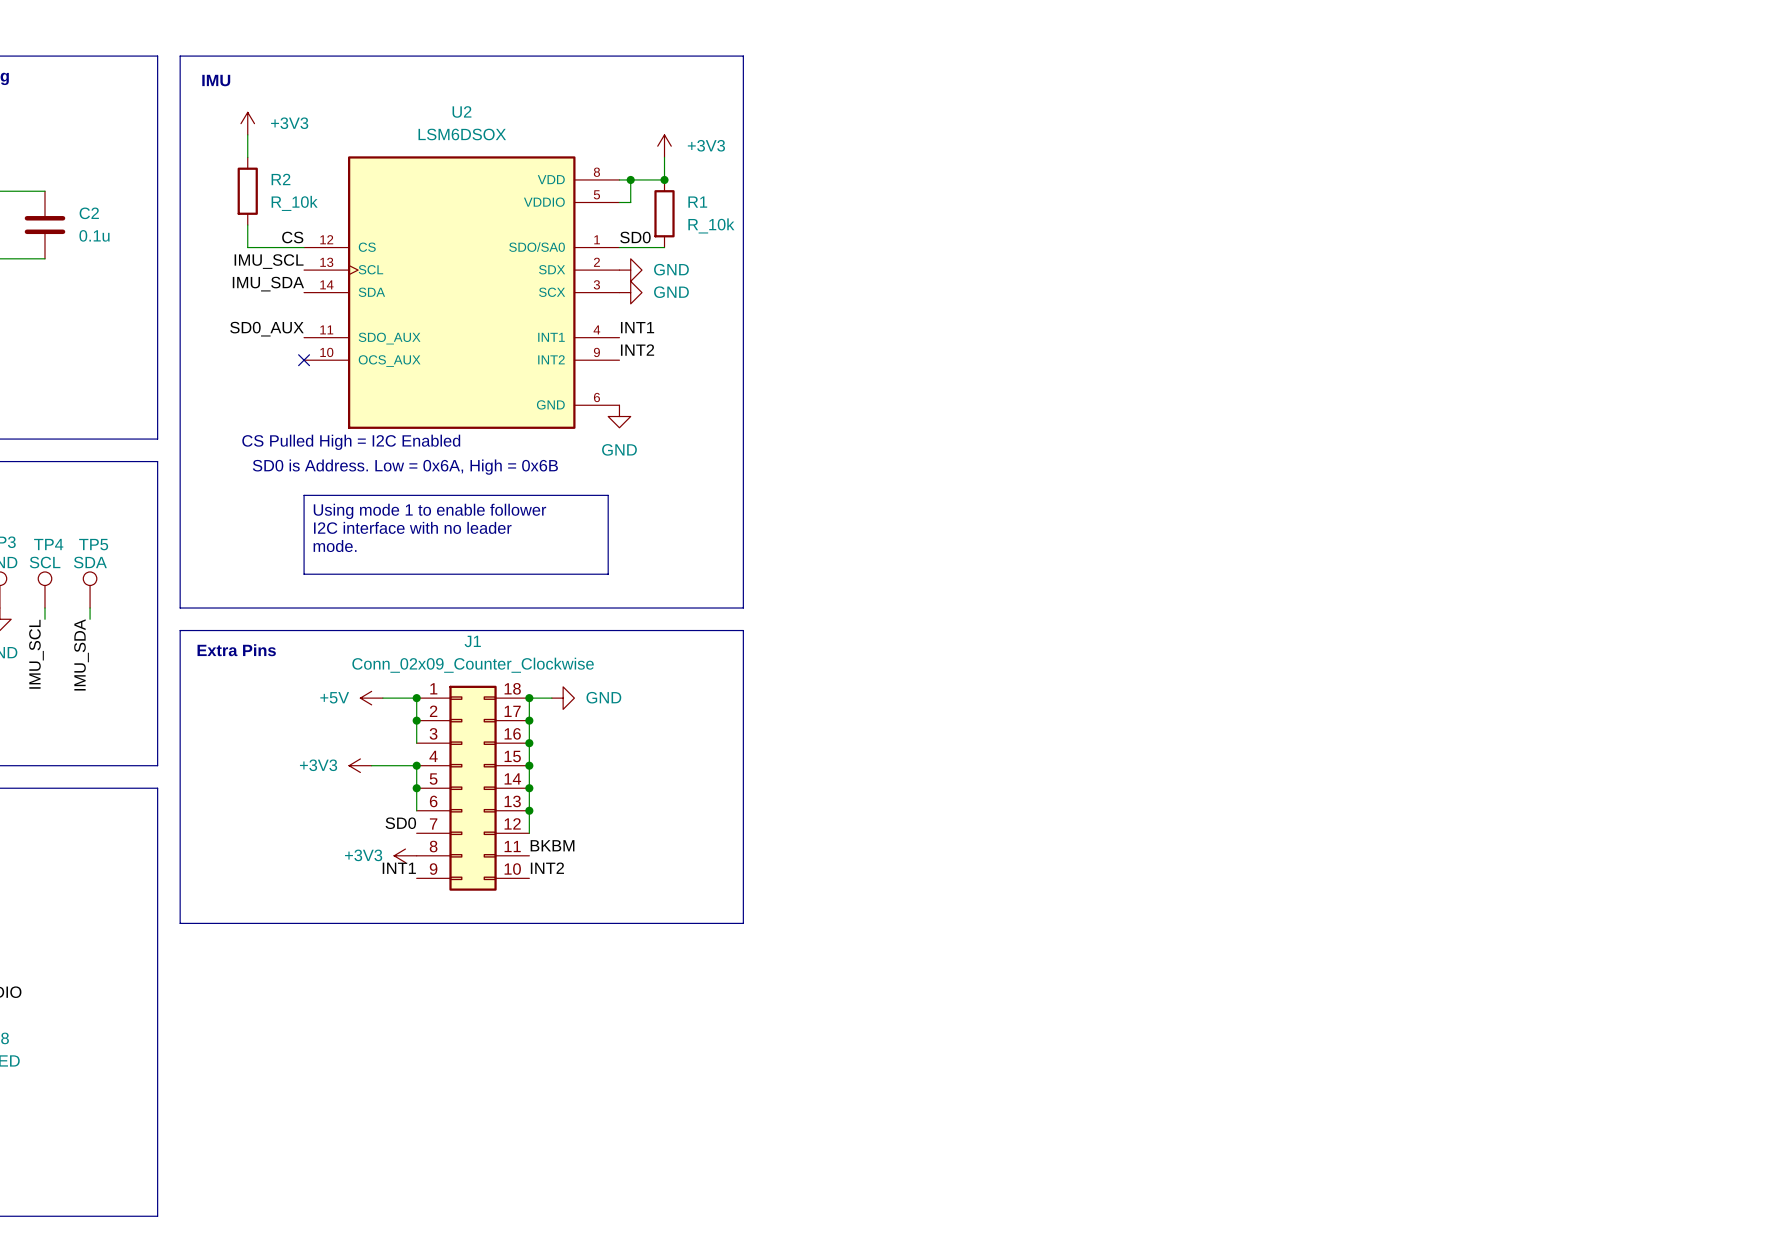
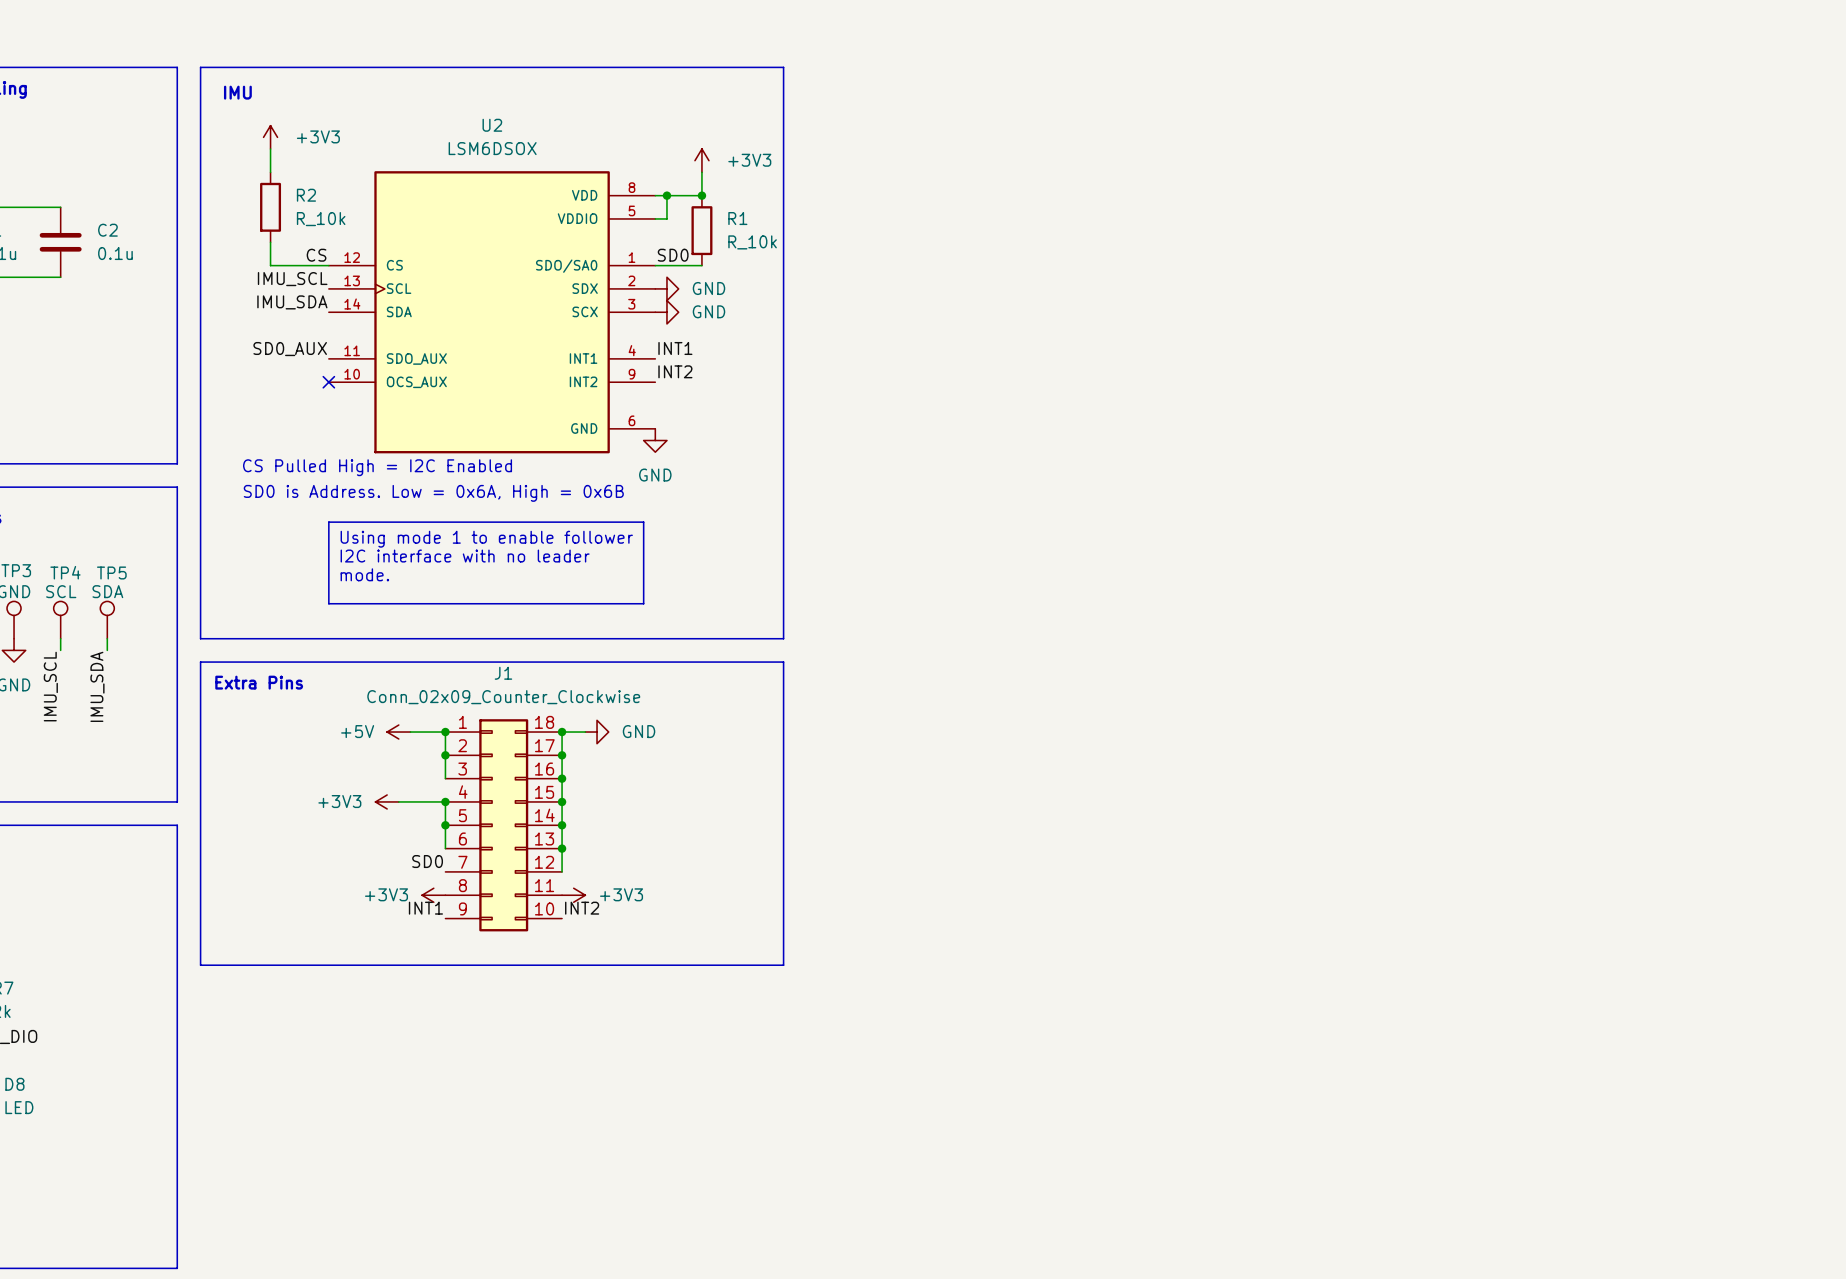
label: BKBM (552, 845) -> none
power symbol: none -> +3V3 (573, 895)

